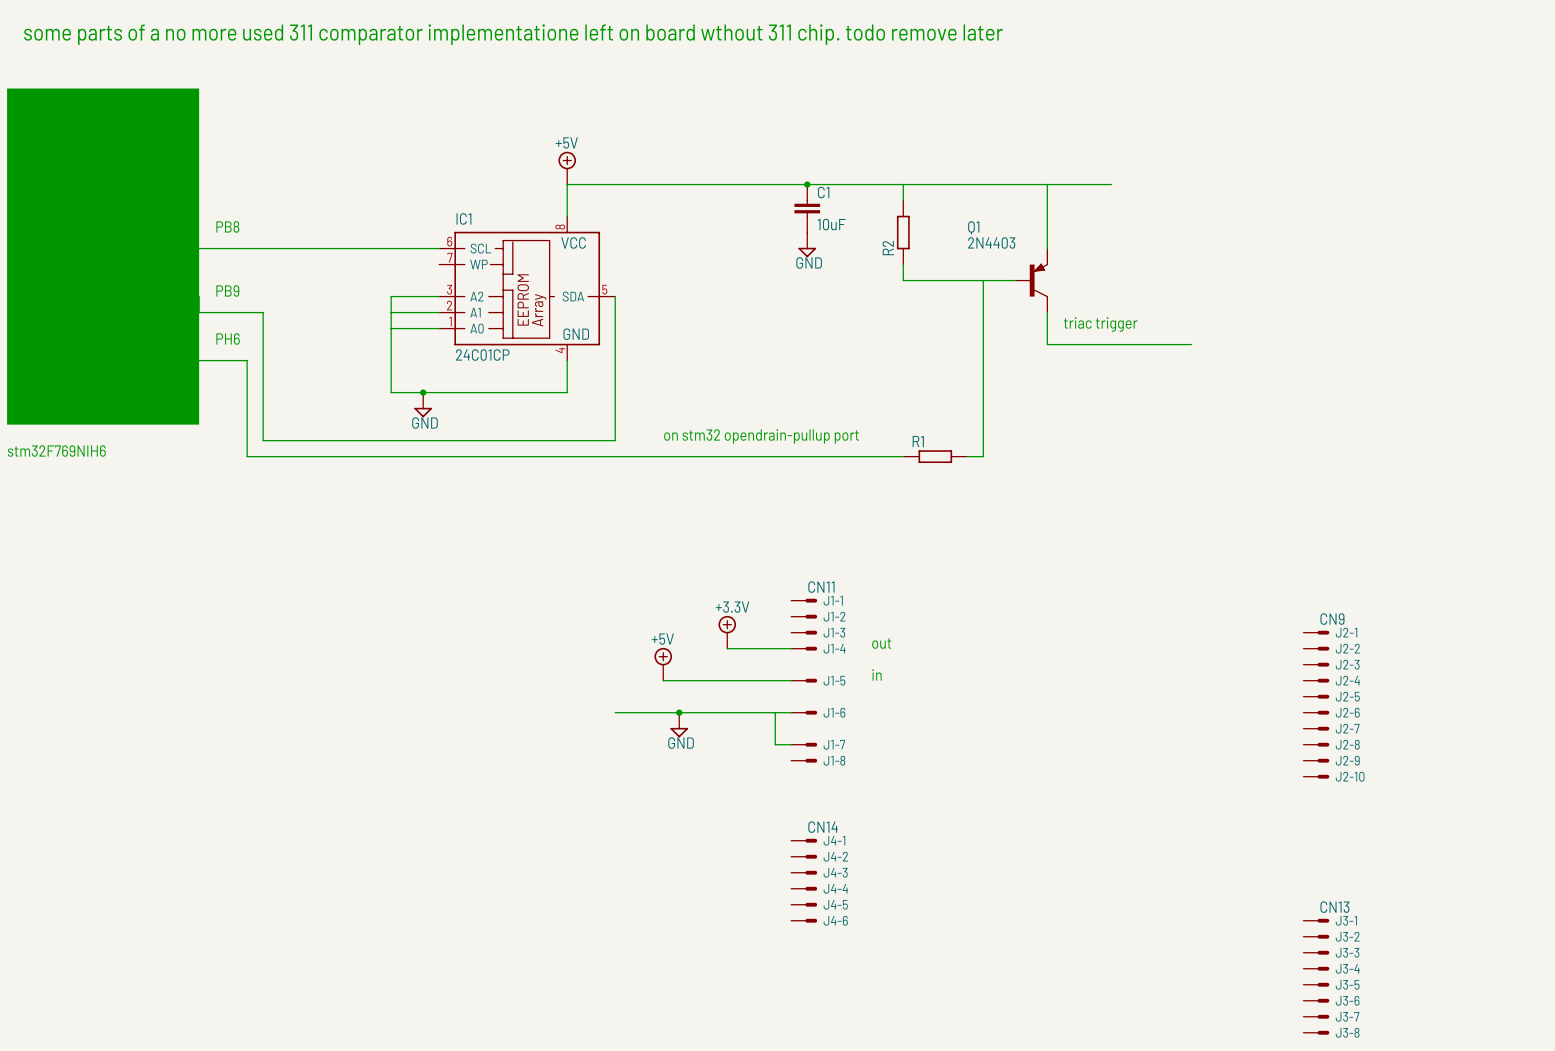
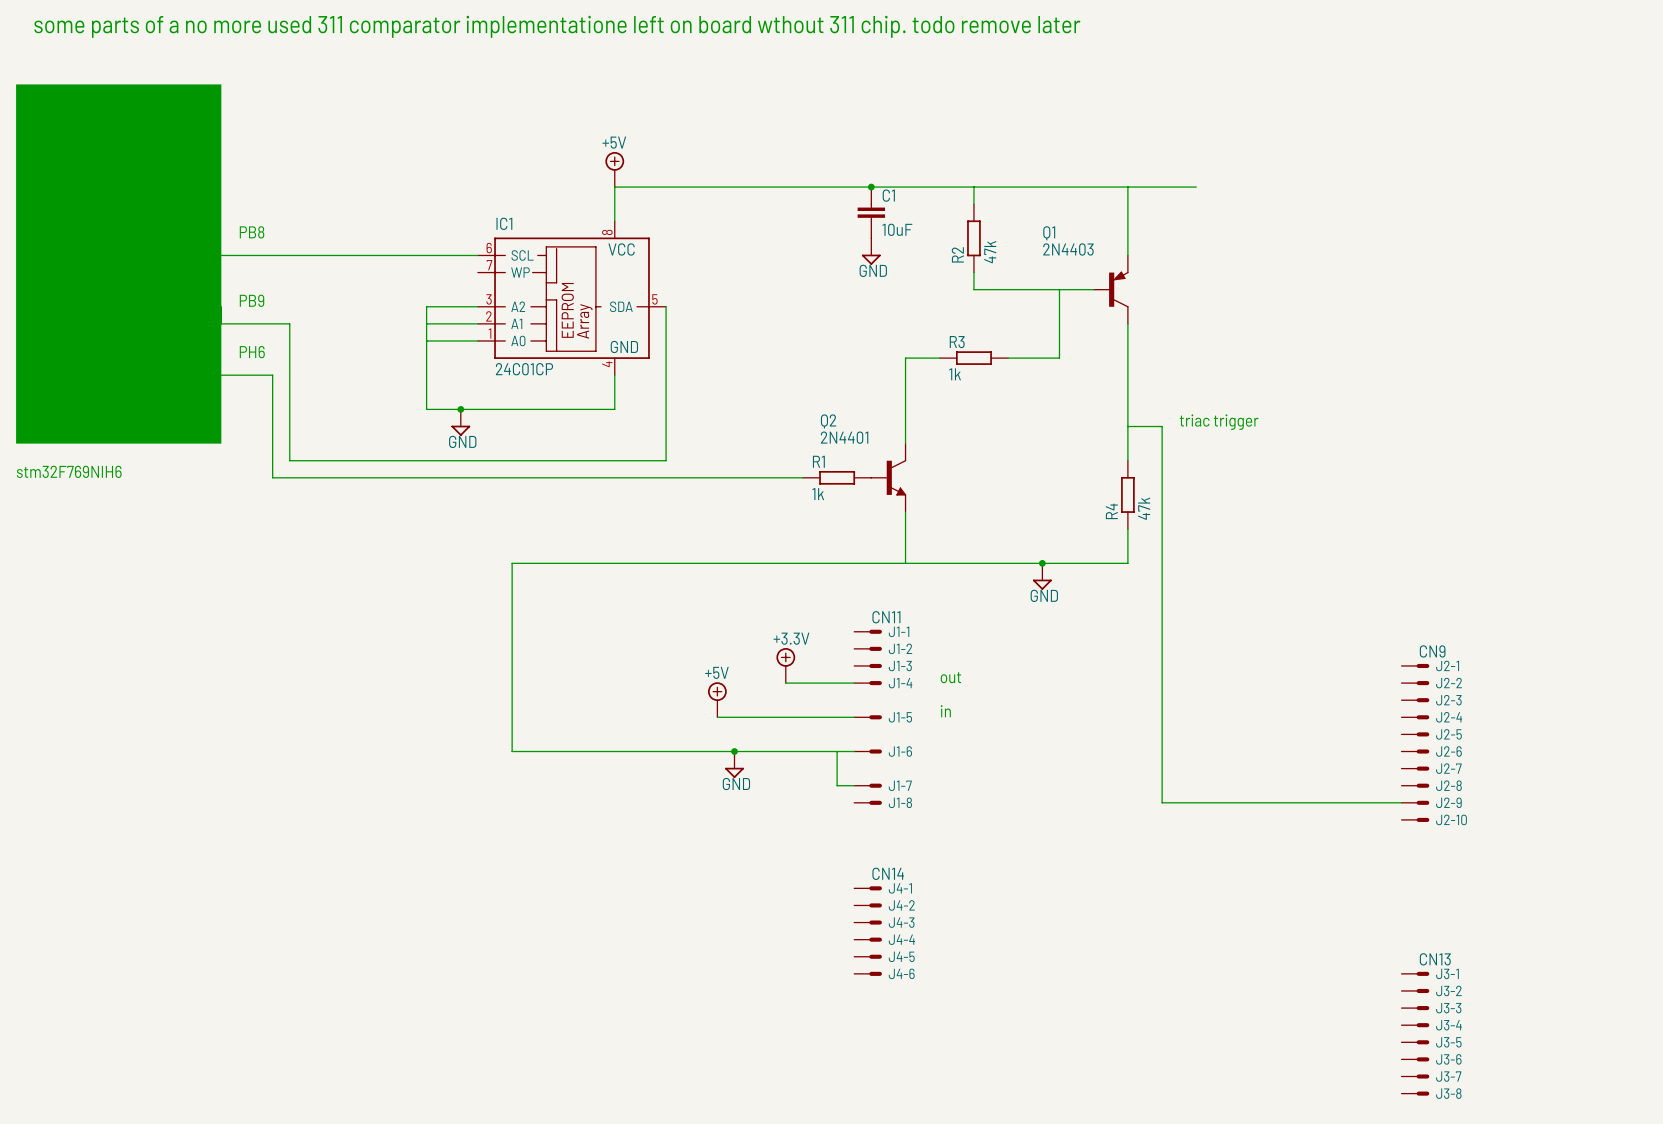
R2 value: none -> 47k (990, 252)
text position: triac trigger (1100, 324) -> triac trigger (1219, 422)
wire: none -> (939, 358) (905, 358) (905, 443)
R3: none -> 1k (973, 358)
wire: (983, 344) (983, 456) (967, 456) -> (1059, 358) (1008, 358)
wire: (1047, 344) (1191, 344) -> (1127, 358) (1127, 460)
wire: none -> (1127, 426) (1162, 426) (1162, 802) (1401, 802)
text: on stm32 opendrain-pullup port (761, 436) -> none
wire: (743, 456) (903, 456) -> none
Q2: none -> 2N4401 (888, 477)
R1 position: (935, 456) -> (837, 477)
R1 value: none -> 1k (818, 494)
R4: none -> 47k (1127, 494)
wire: none -> (905, 512) (905, 563)
wire: none -> (1127, 529) (1127, 563) (512, 563) (512, 751) (666, 751)
junction: none -> (1042, 563)
power symbol: none -> GND (1042, 576)

